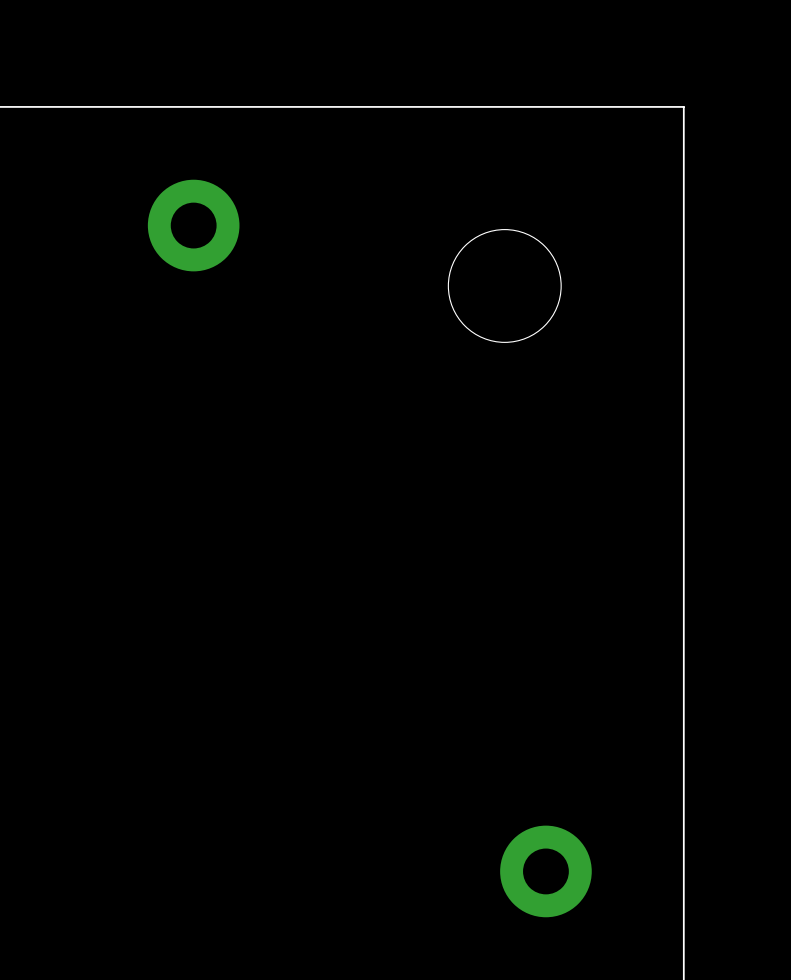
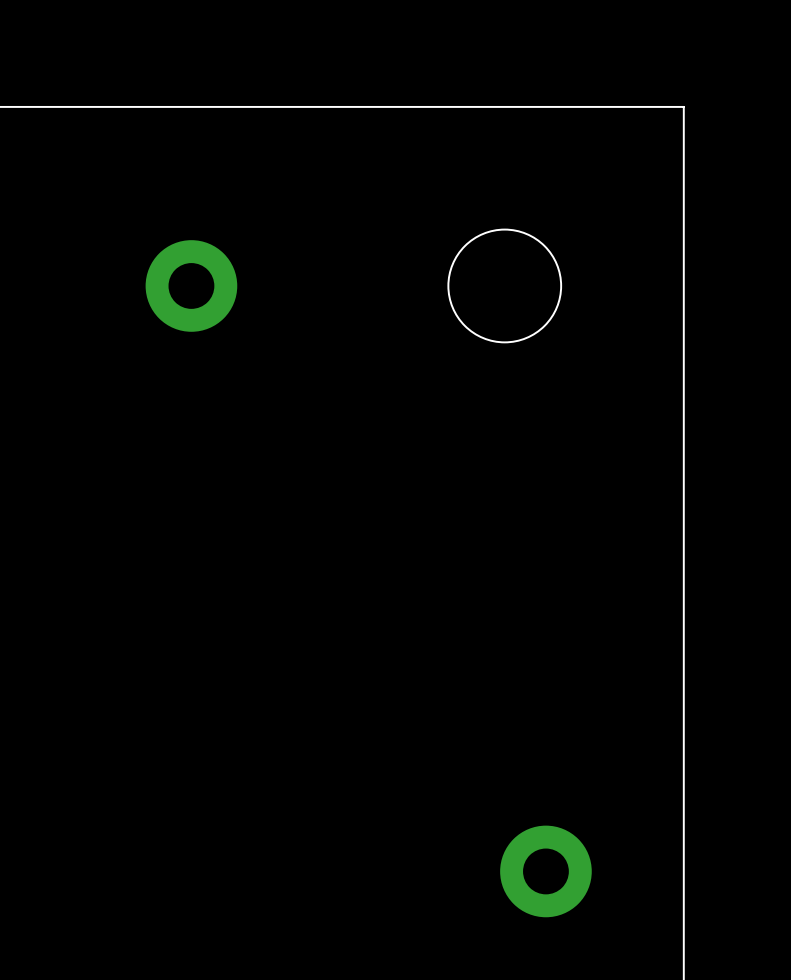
part position: (193, 225) -> (191, 285)

